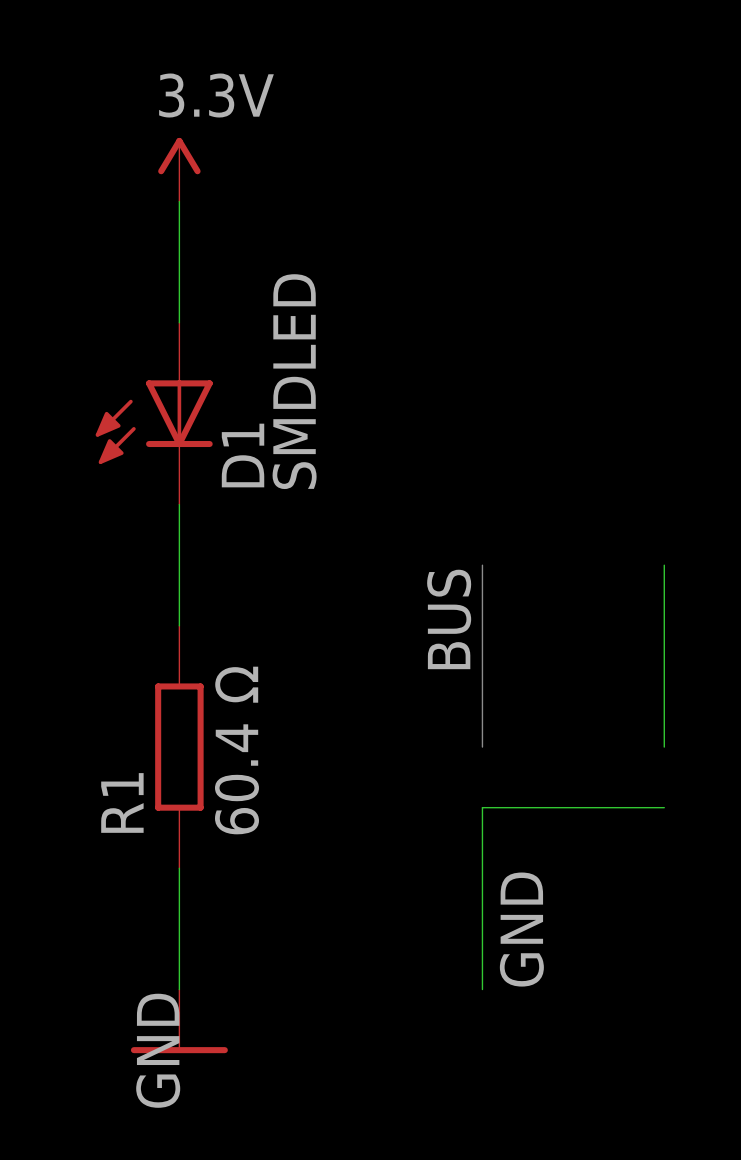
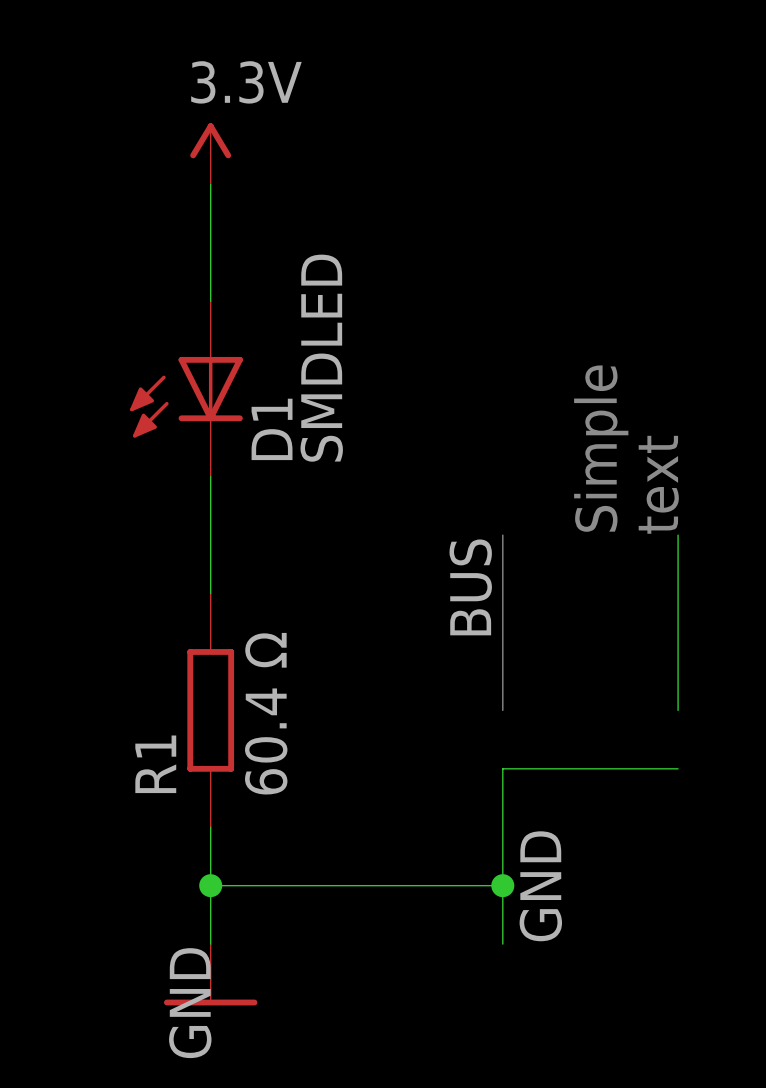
text: none -> Simple (601, 448)
text: none -> text (658, 484)
wire: none -> (210, 885) (502, 885)
junction: none -> (210, 885)
junction: none -> (502, 885)

